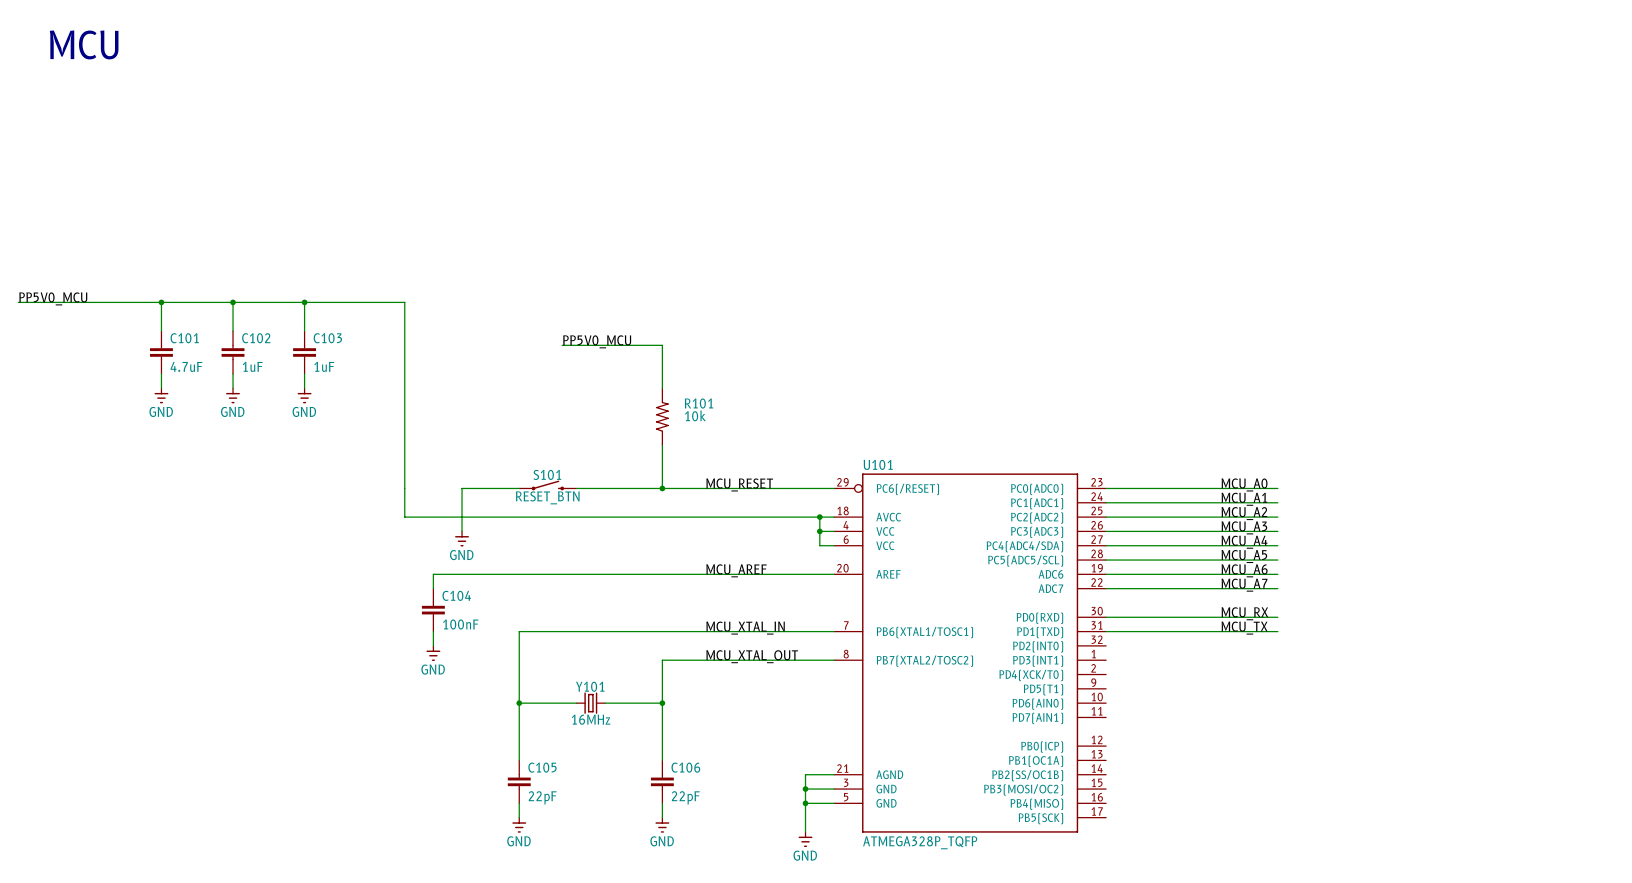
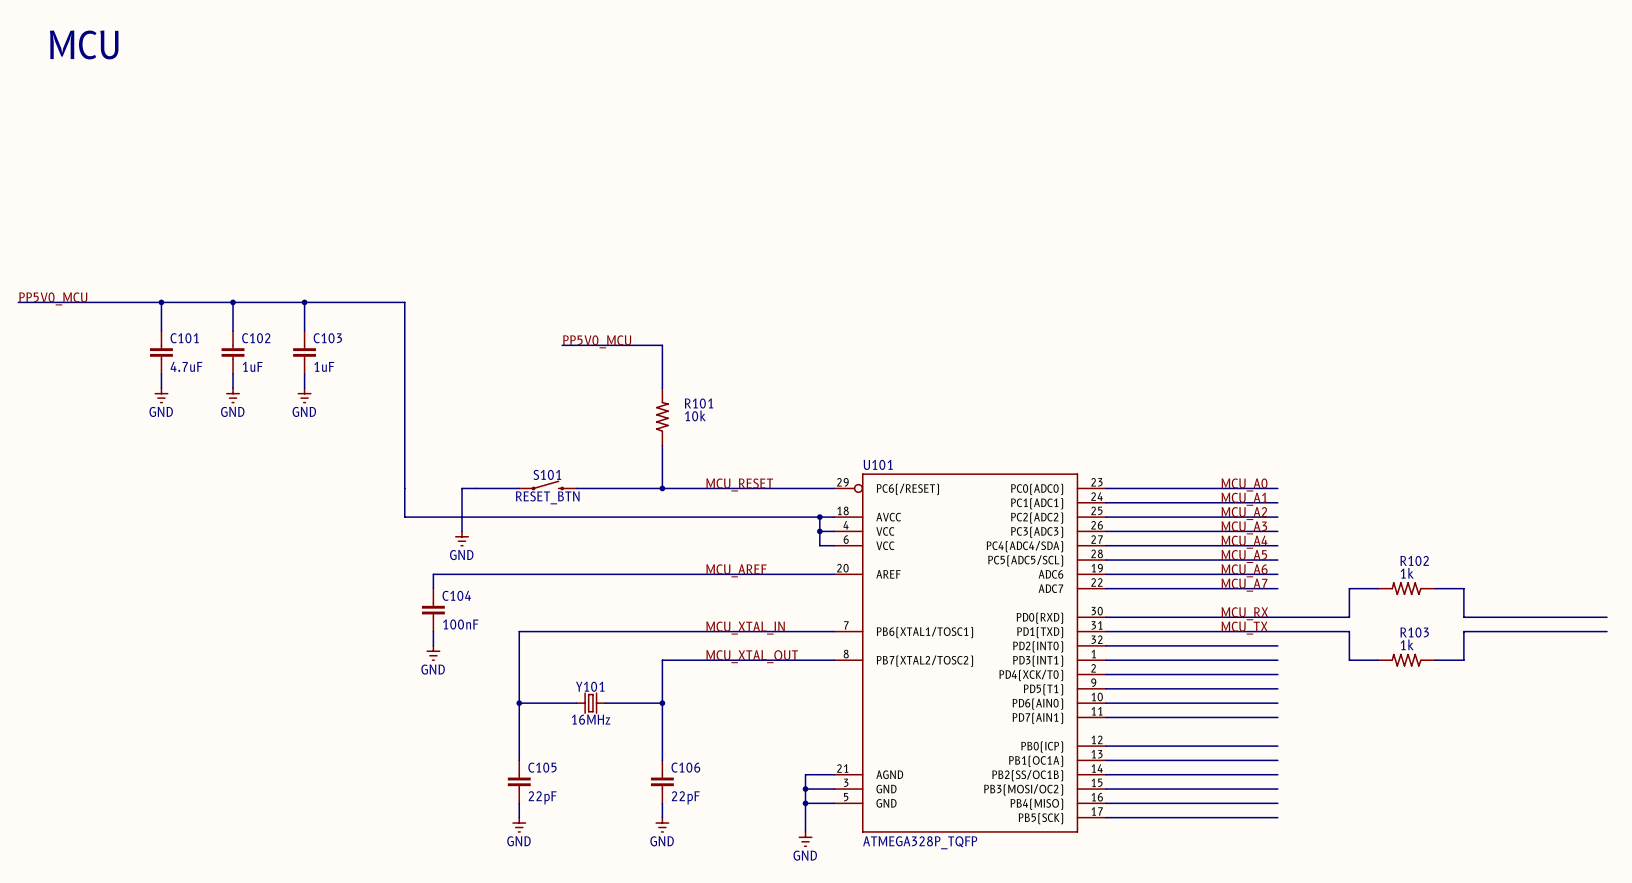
wire: none -> (1378, 588) (1349, 588) (1349, 617) (1277, 617)
R102: none -> 1k (1406, 588)
wire: none -> (1435, 588) (1463, 588) (1463, 617) (1607, 617)
wire: none -> (1277, 631) (1349, 631) (1349, 660) (1378, 660)
wire: none -> (1607, 631) (1463, 631) (1463, 660) (1435, 660)
wire: none -> (1106, 645) (1277, 645)
wire: none -> (1106, 660) (1277, 660)
R103: none -> 1k (1406, 660)
wire: none -> (1106, 674) (1277, 674)
wire: none -> (1106, 688) (1277, 688)
wire: none -> (1106, 703) (1277, 703)
wire: none -> (1106, 717) (1277, 717)
wire: none -> (1106, 746) (1277, 746)
wire: none -> (1106, 760) (1277, 760)
wire: none -> (1106, 774) (1277, 774)
wire: none -> (1106, 789) (1277, 789)
wire: none -> (1106, 803) (1277, 803)
wire: none -> (1106, 817) (1277, 817)

